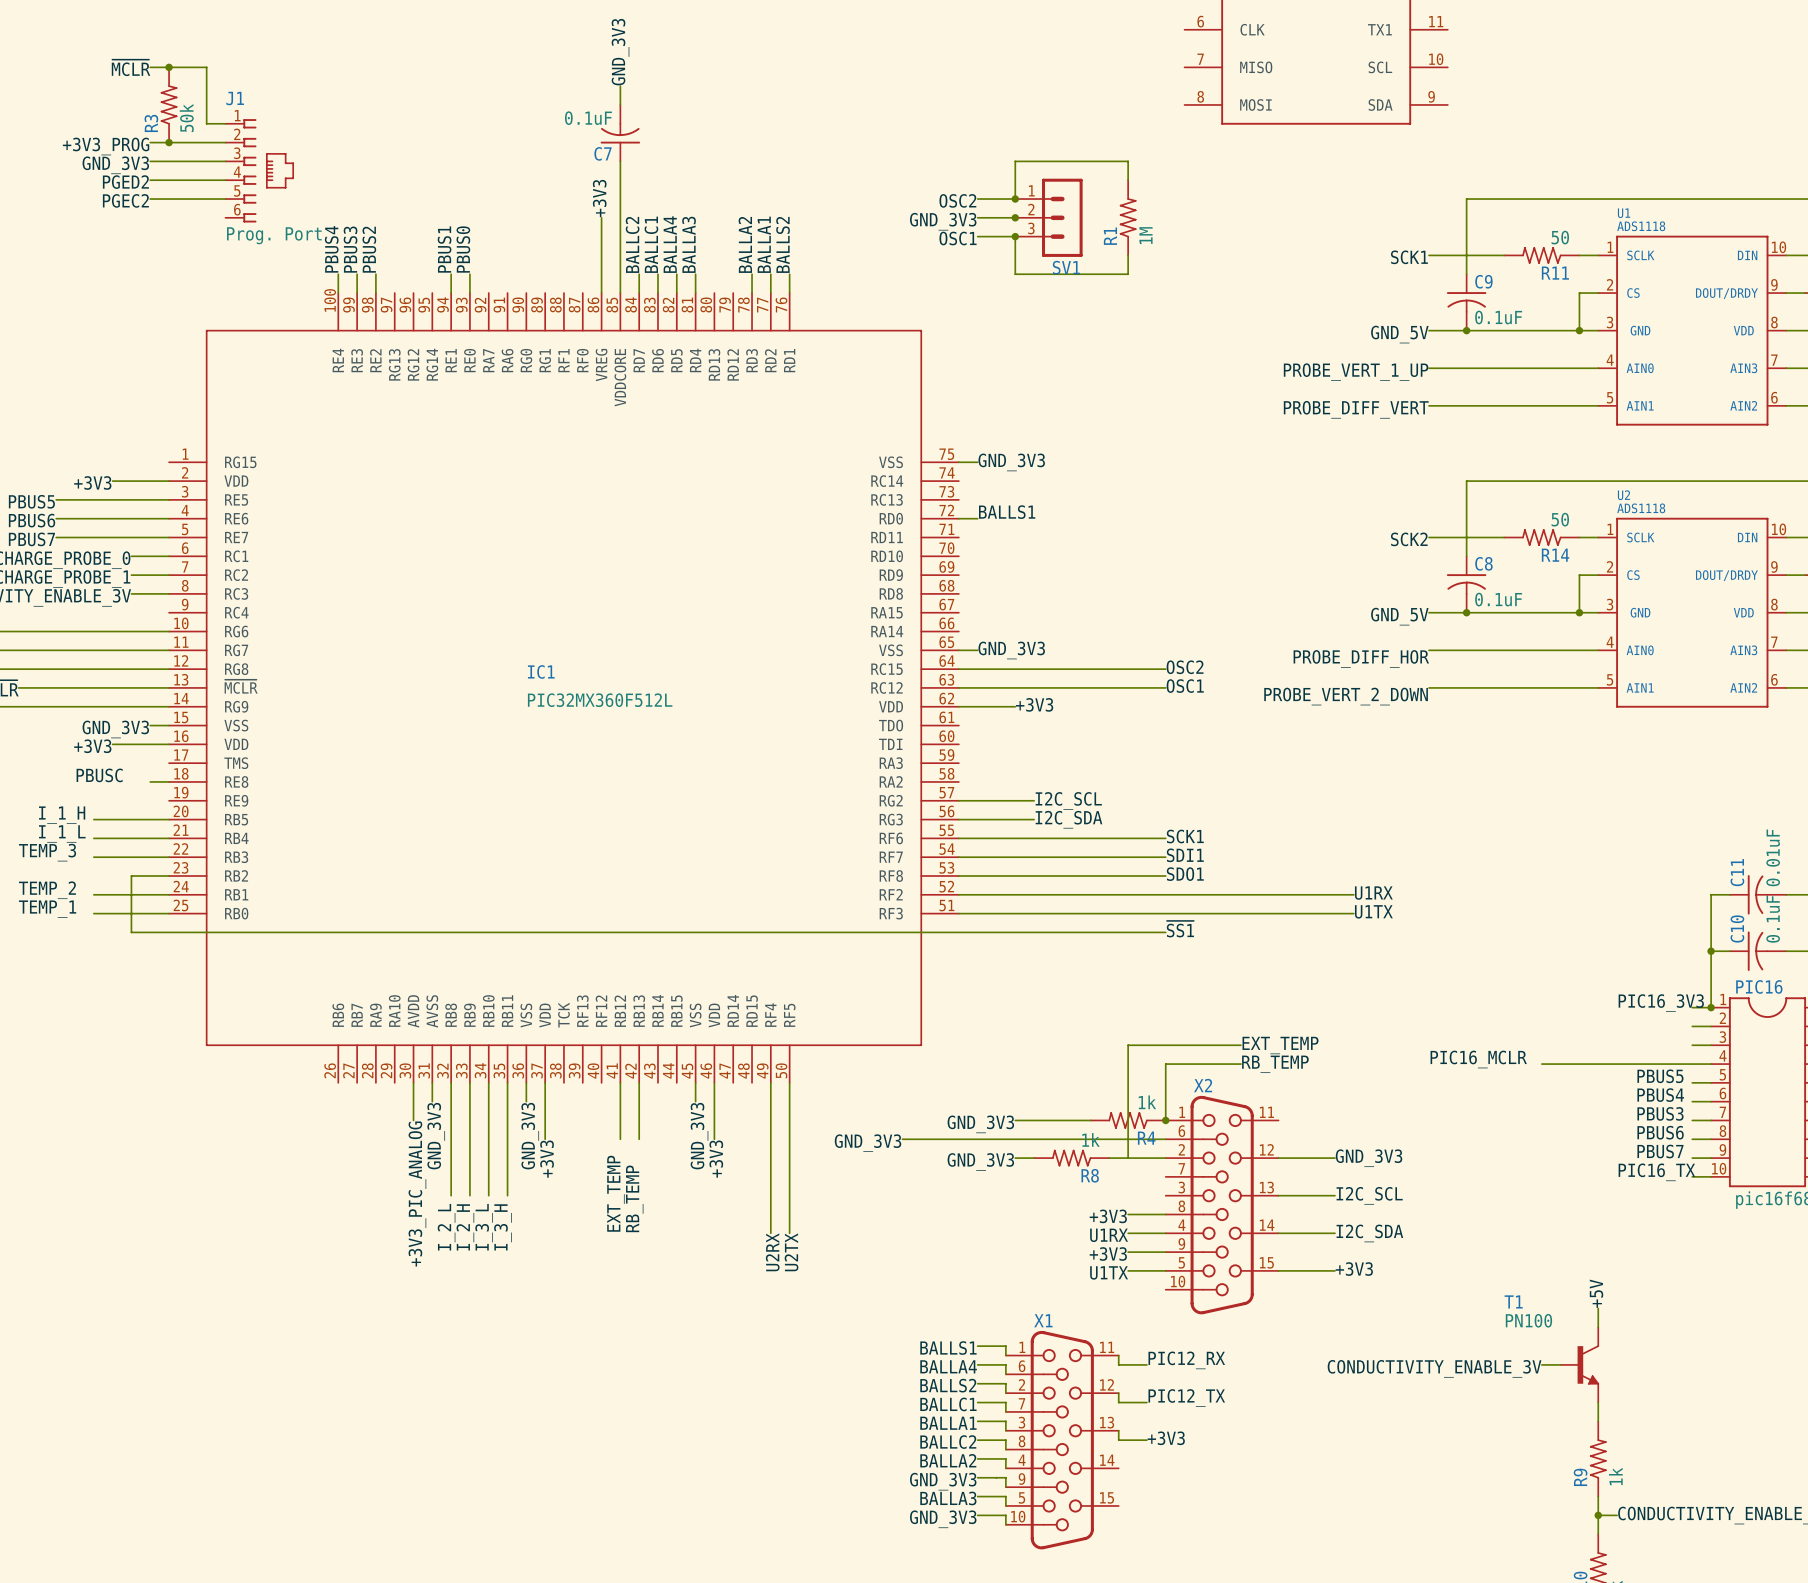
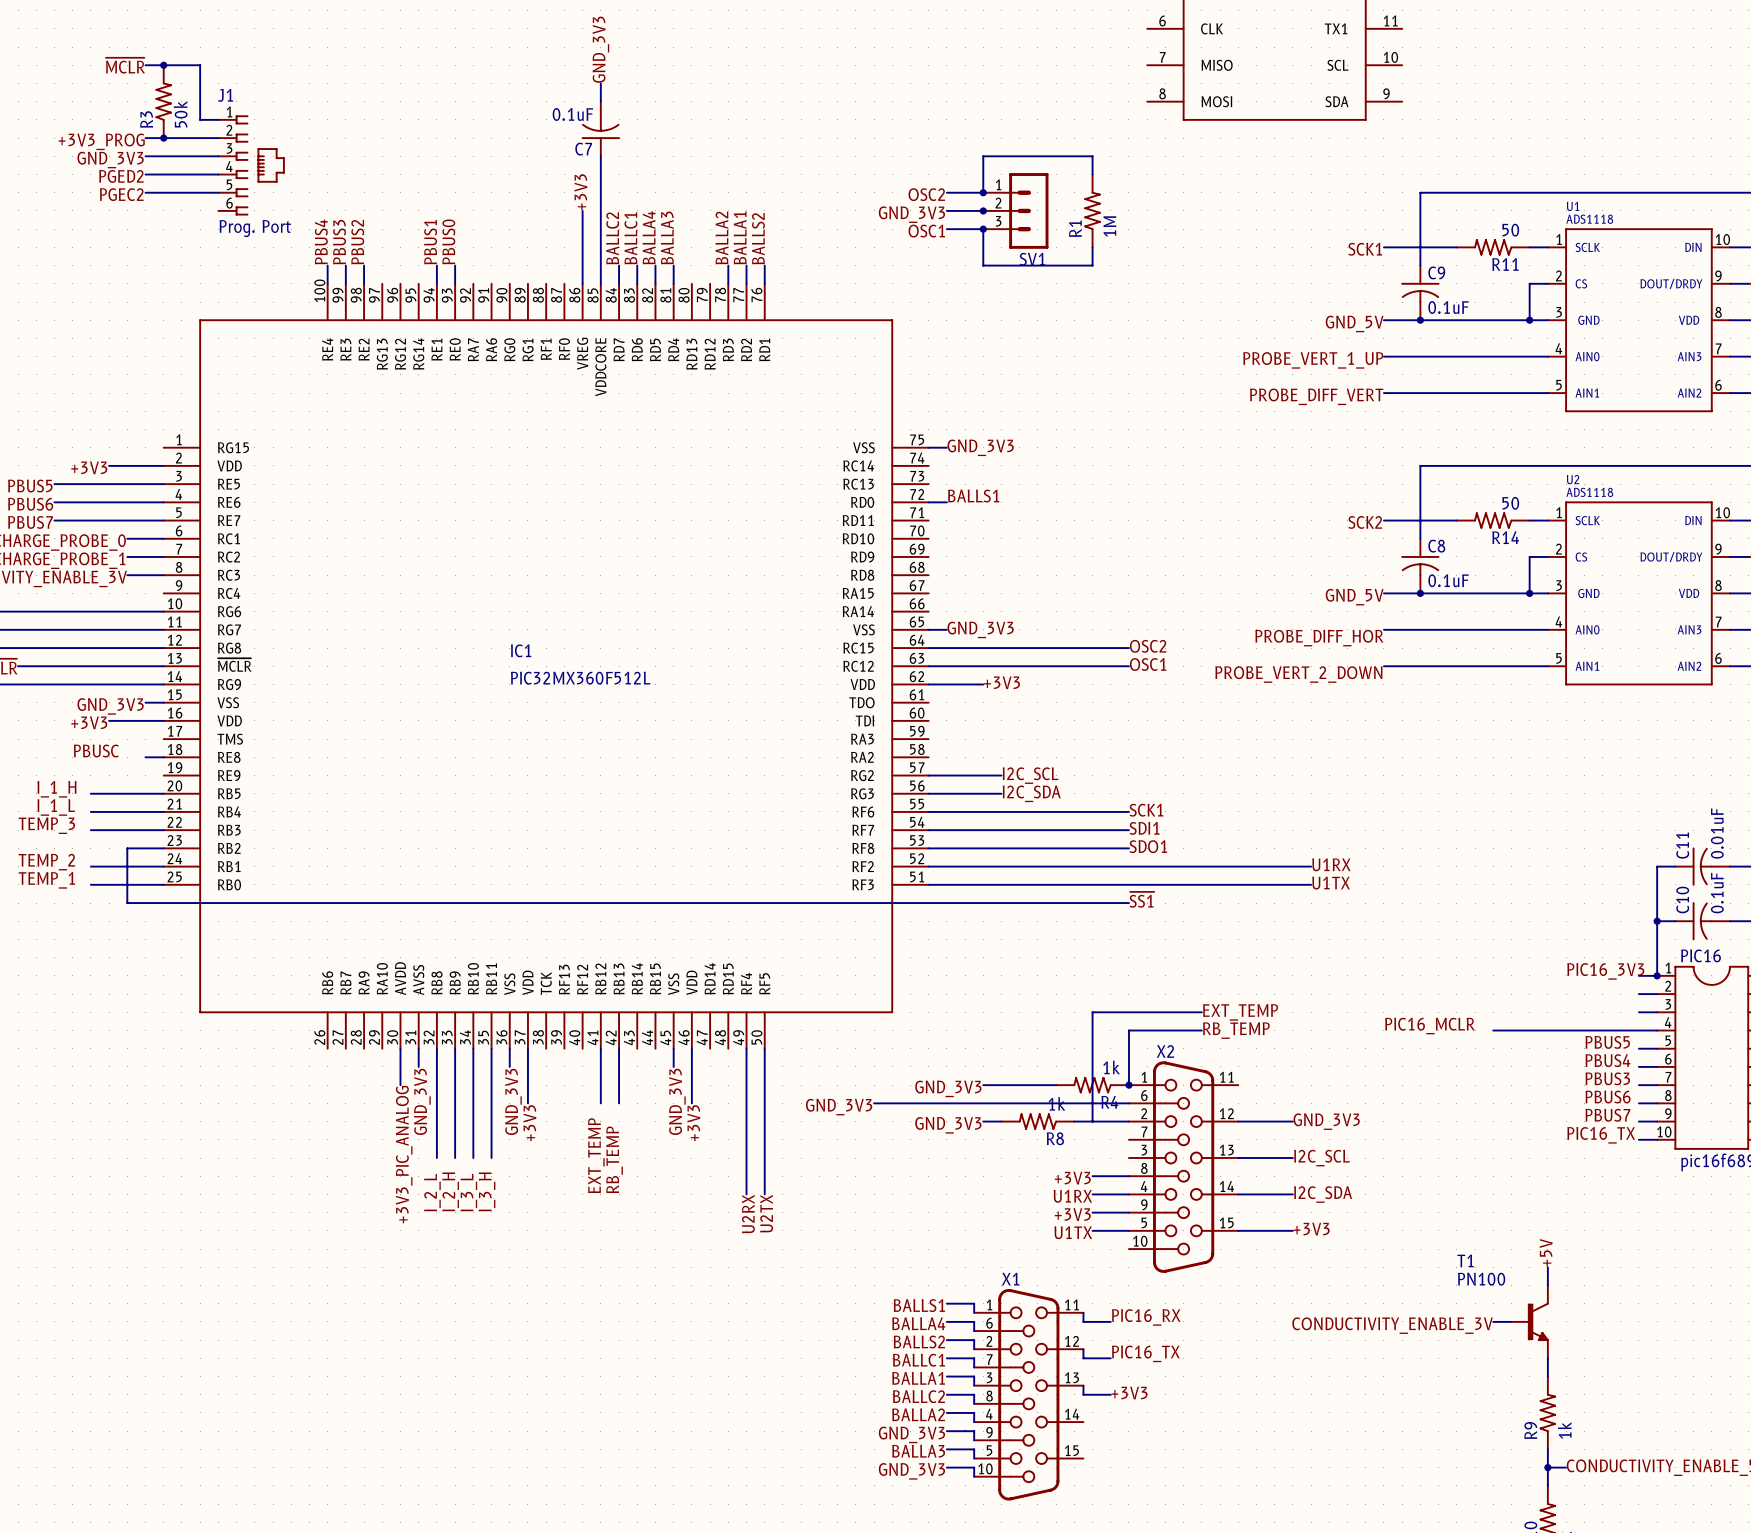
label: PIC12_RX (1186, 1360) -> PIC16_RX (1146, 1317)
label: PIC12_TX (1186, 1397) -> PIC16_TX (1145, 1353)

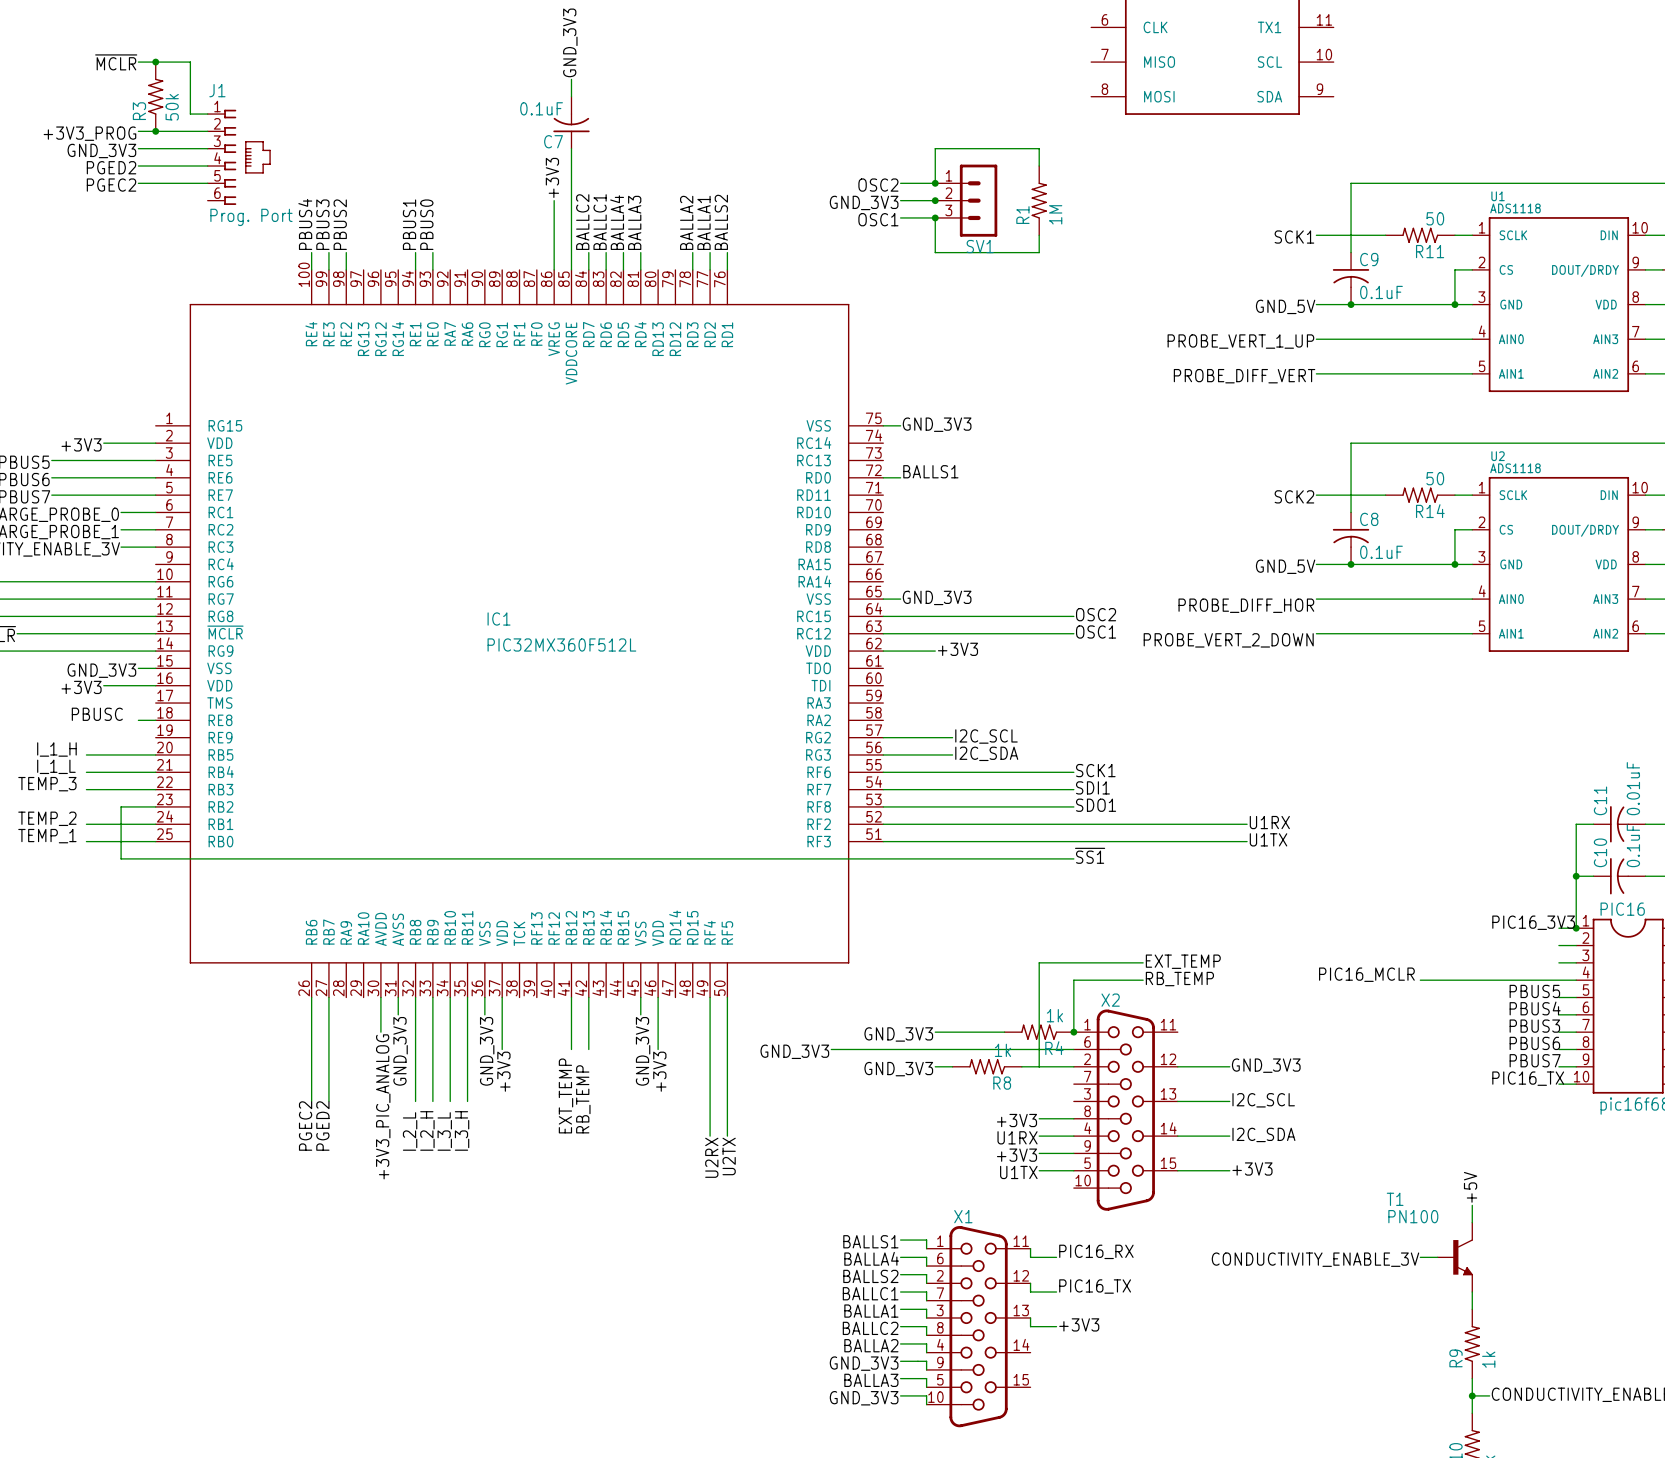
wire: none -> (311, 997) (311, 1101)
wire: none -> (328, 997) (328, 1101)
label: none -> PGEC2 (305, 1126)
label: none -> PGED2 (322, 1126)

